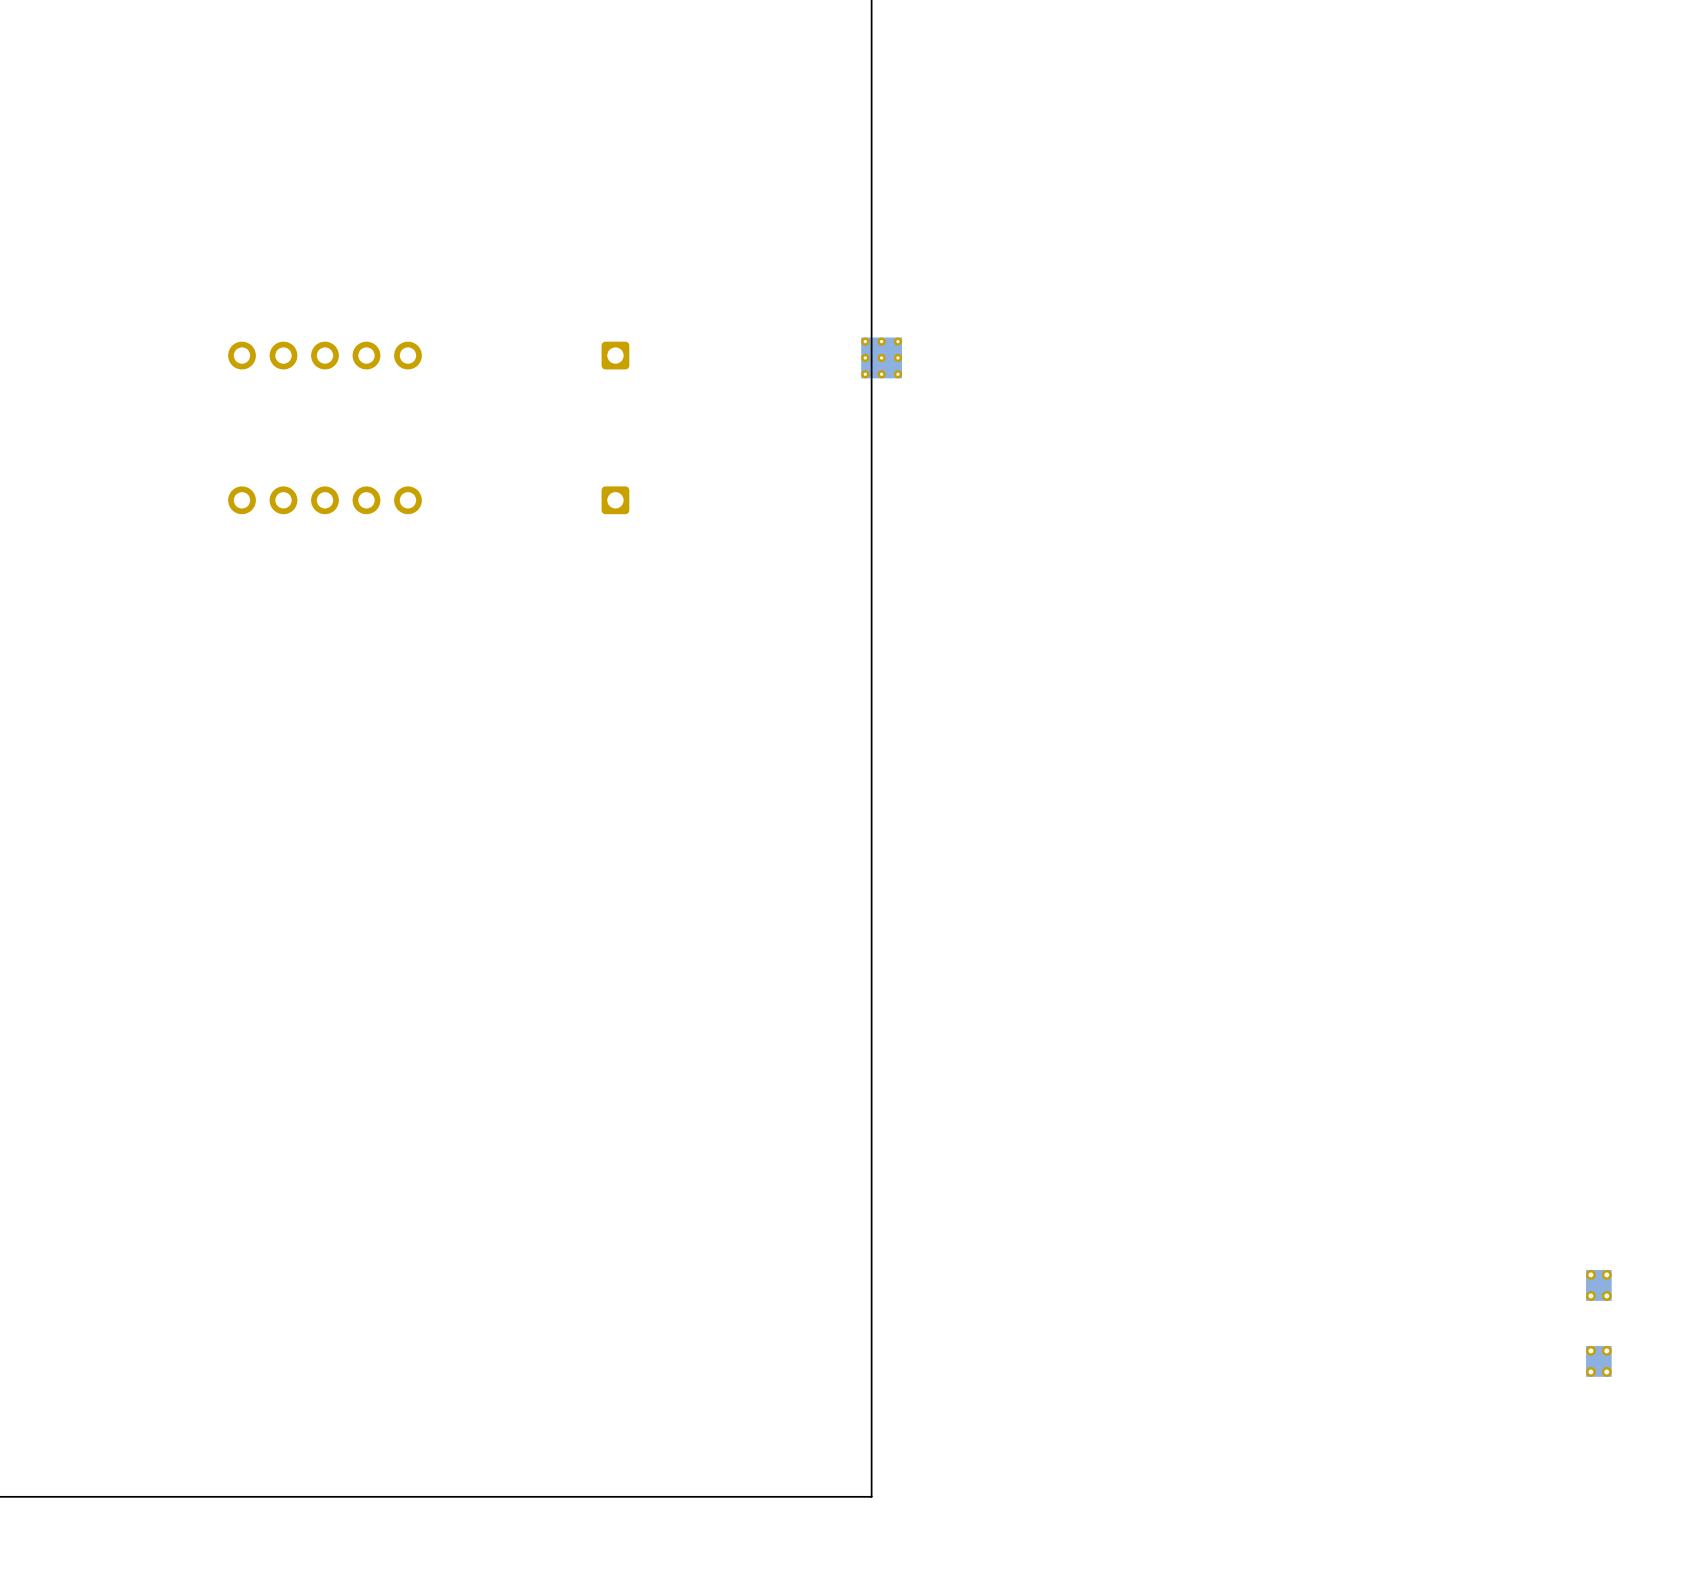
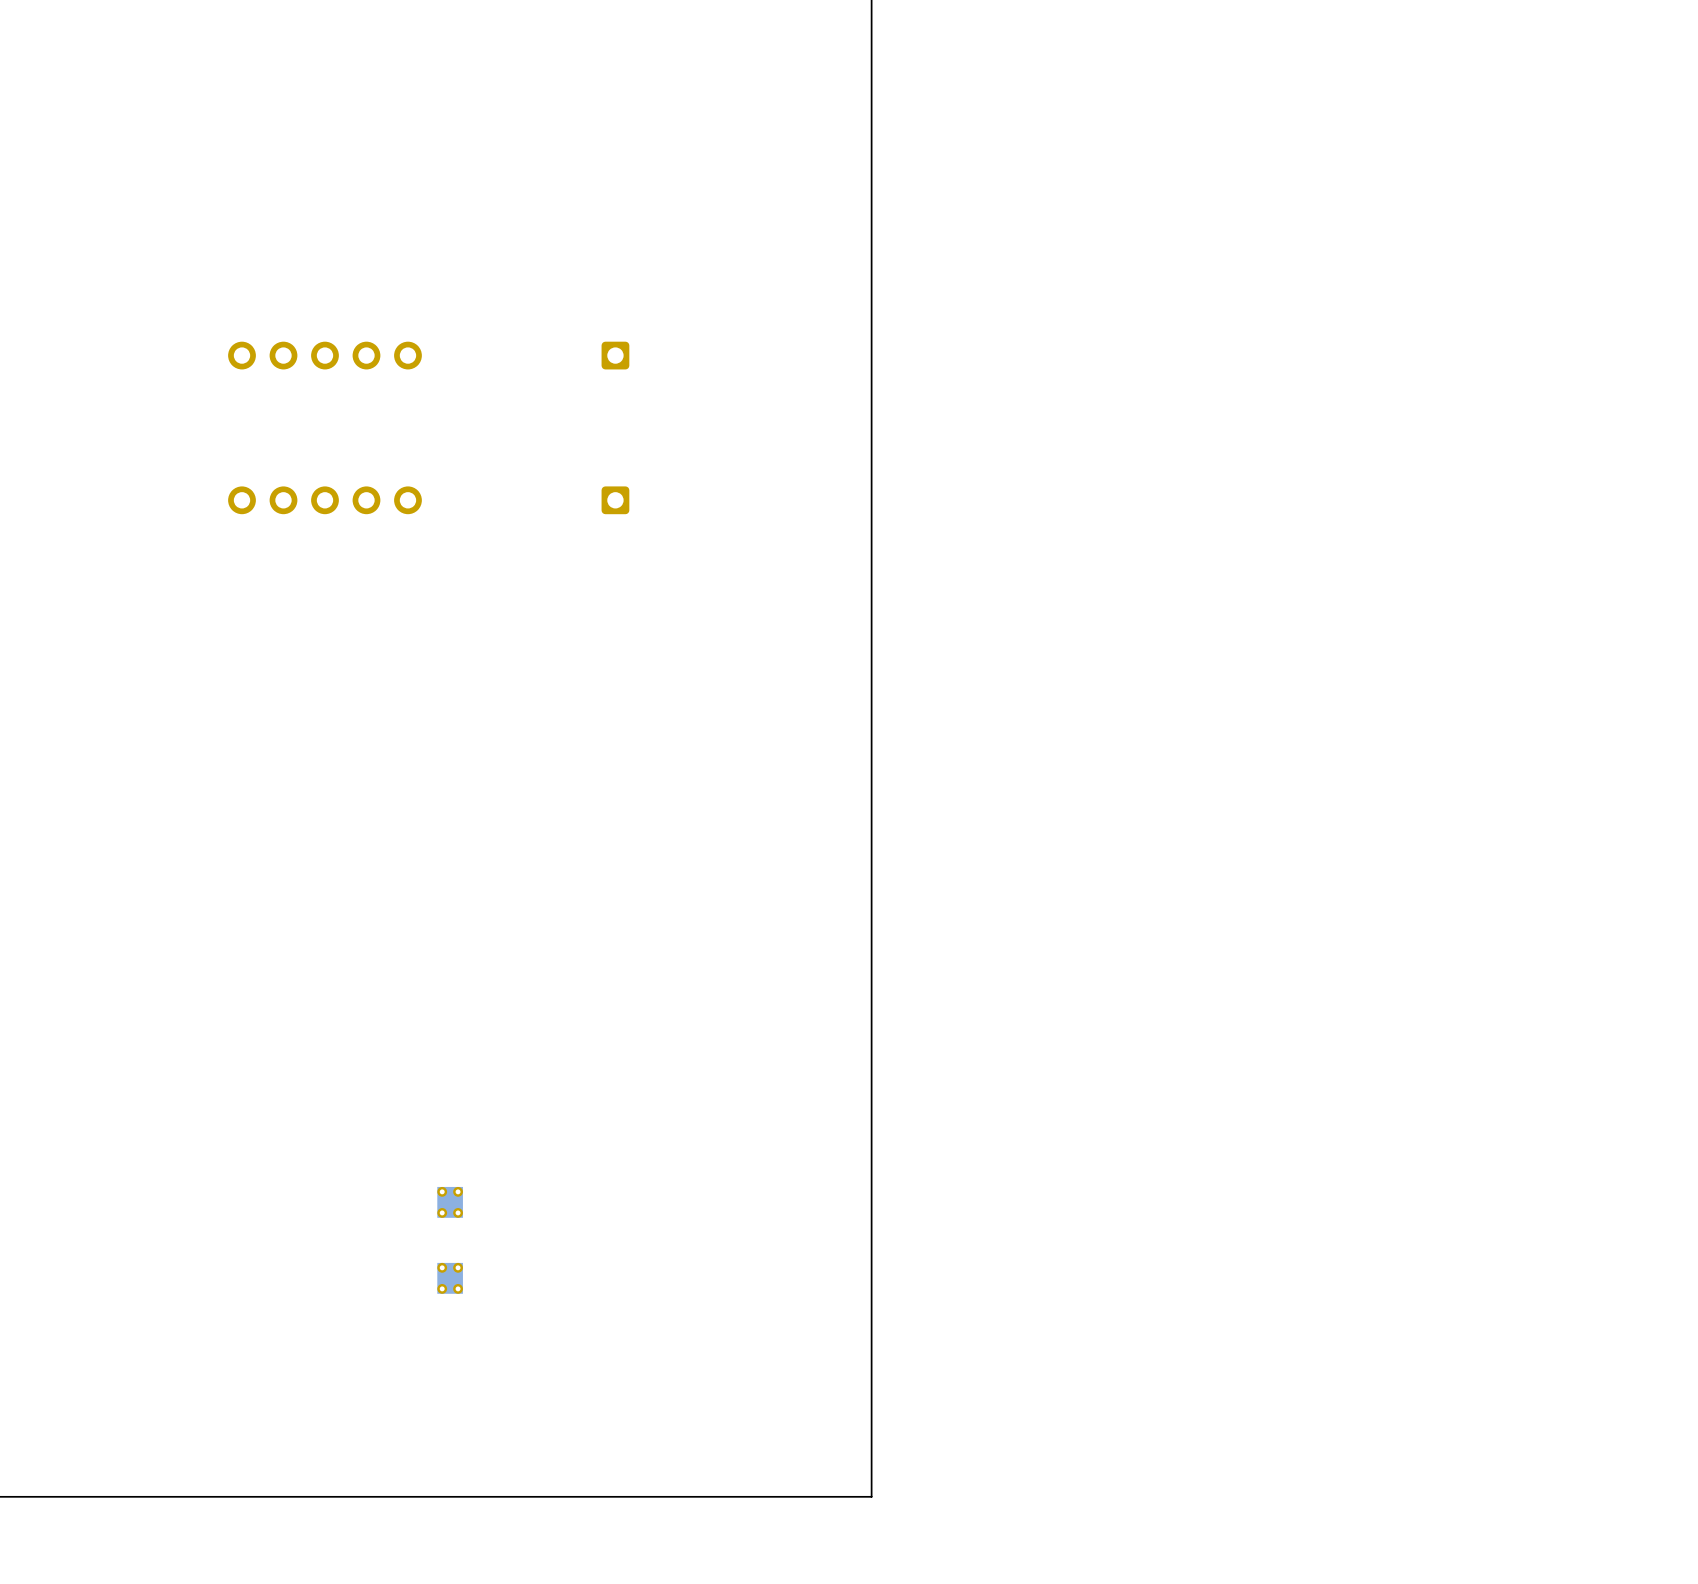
part: (881, 357) -> none
part: none -> (450, 1202)
part: none -> (450, 1278)
part: (1598, 1285) -> none
part: (1598, 1361) -> none

